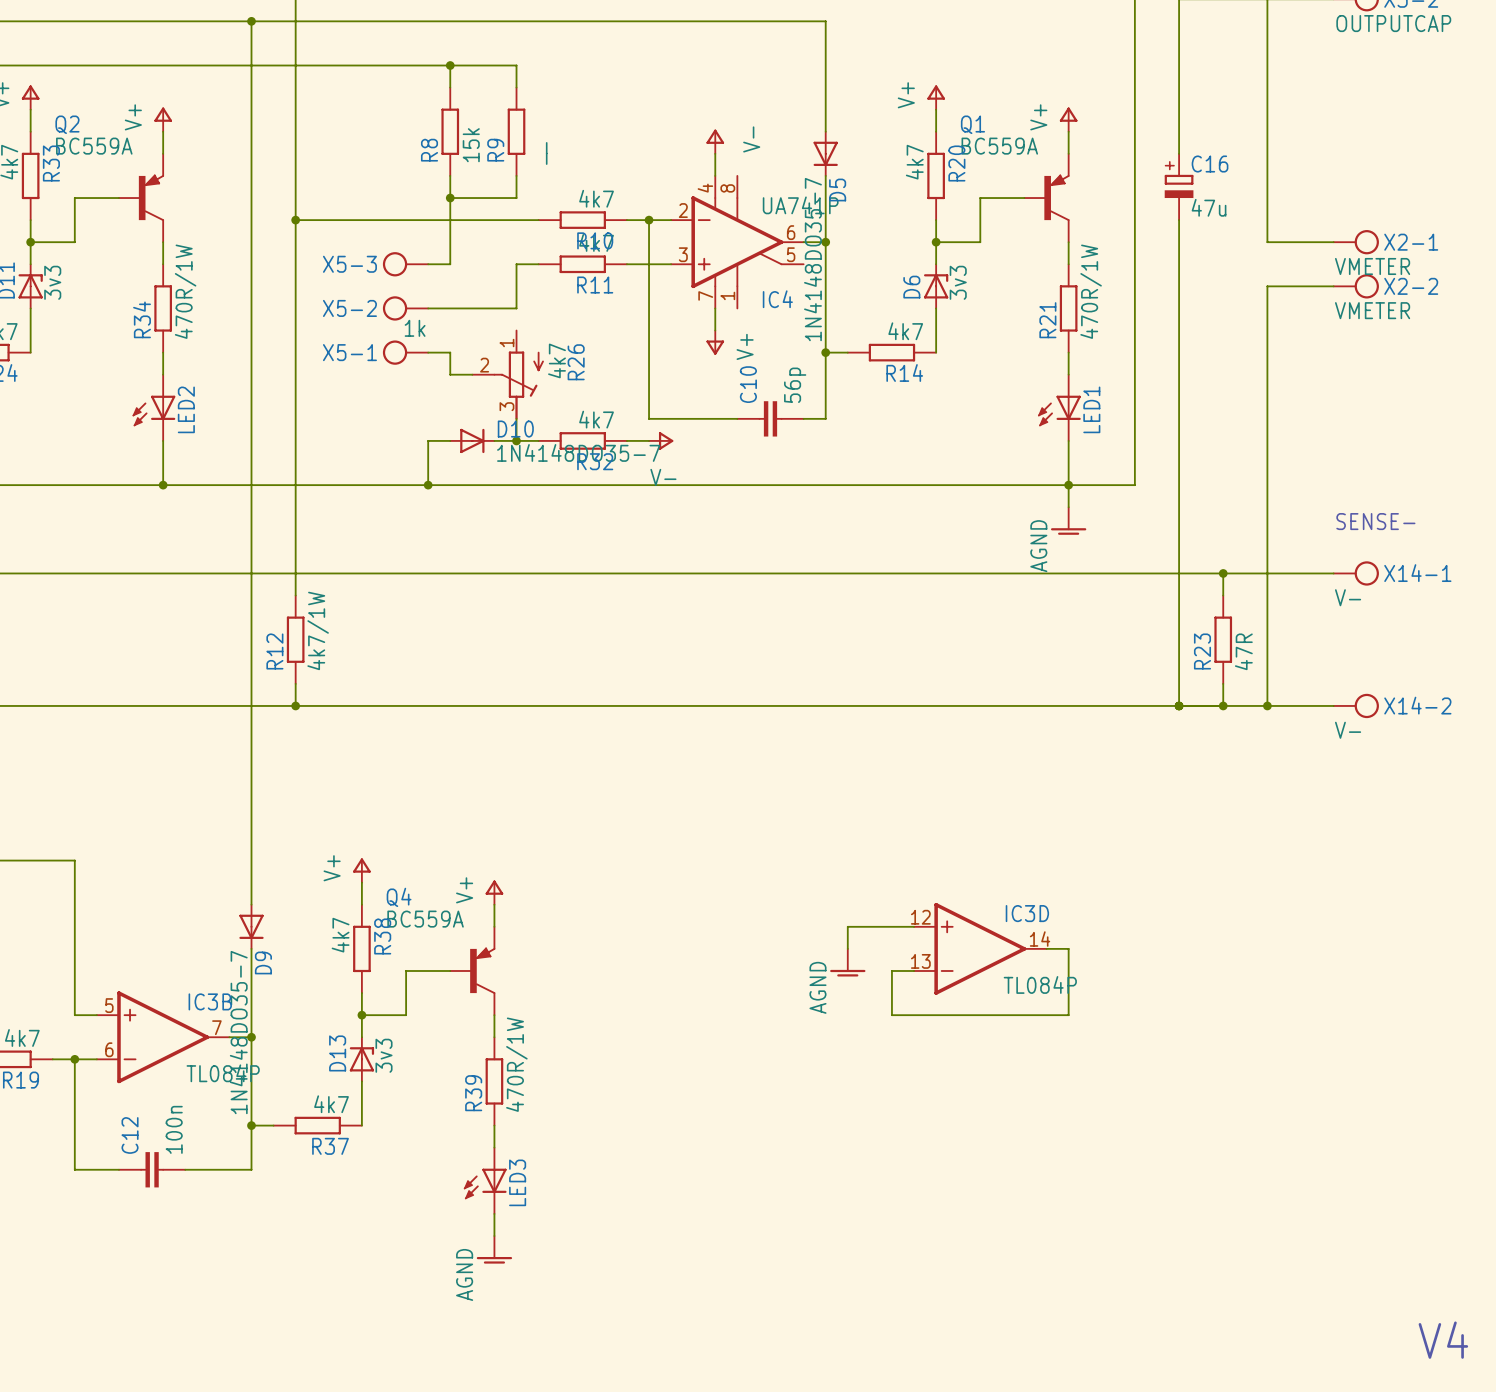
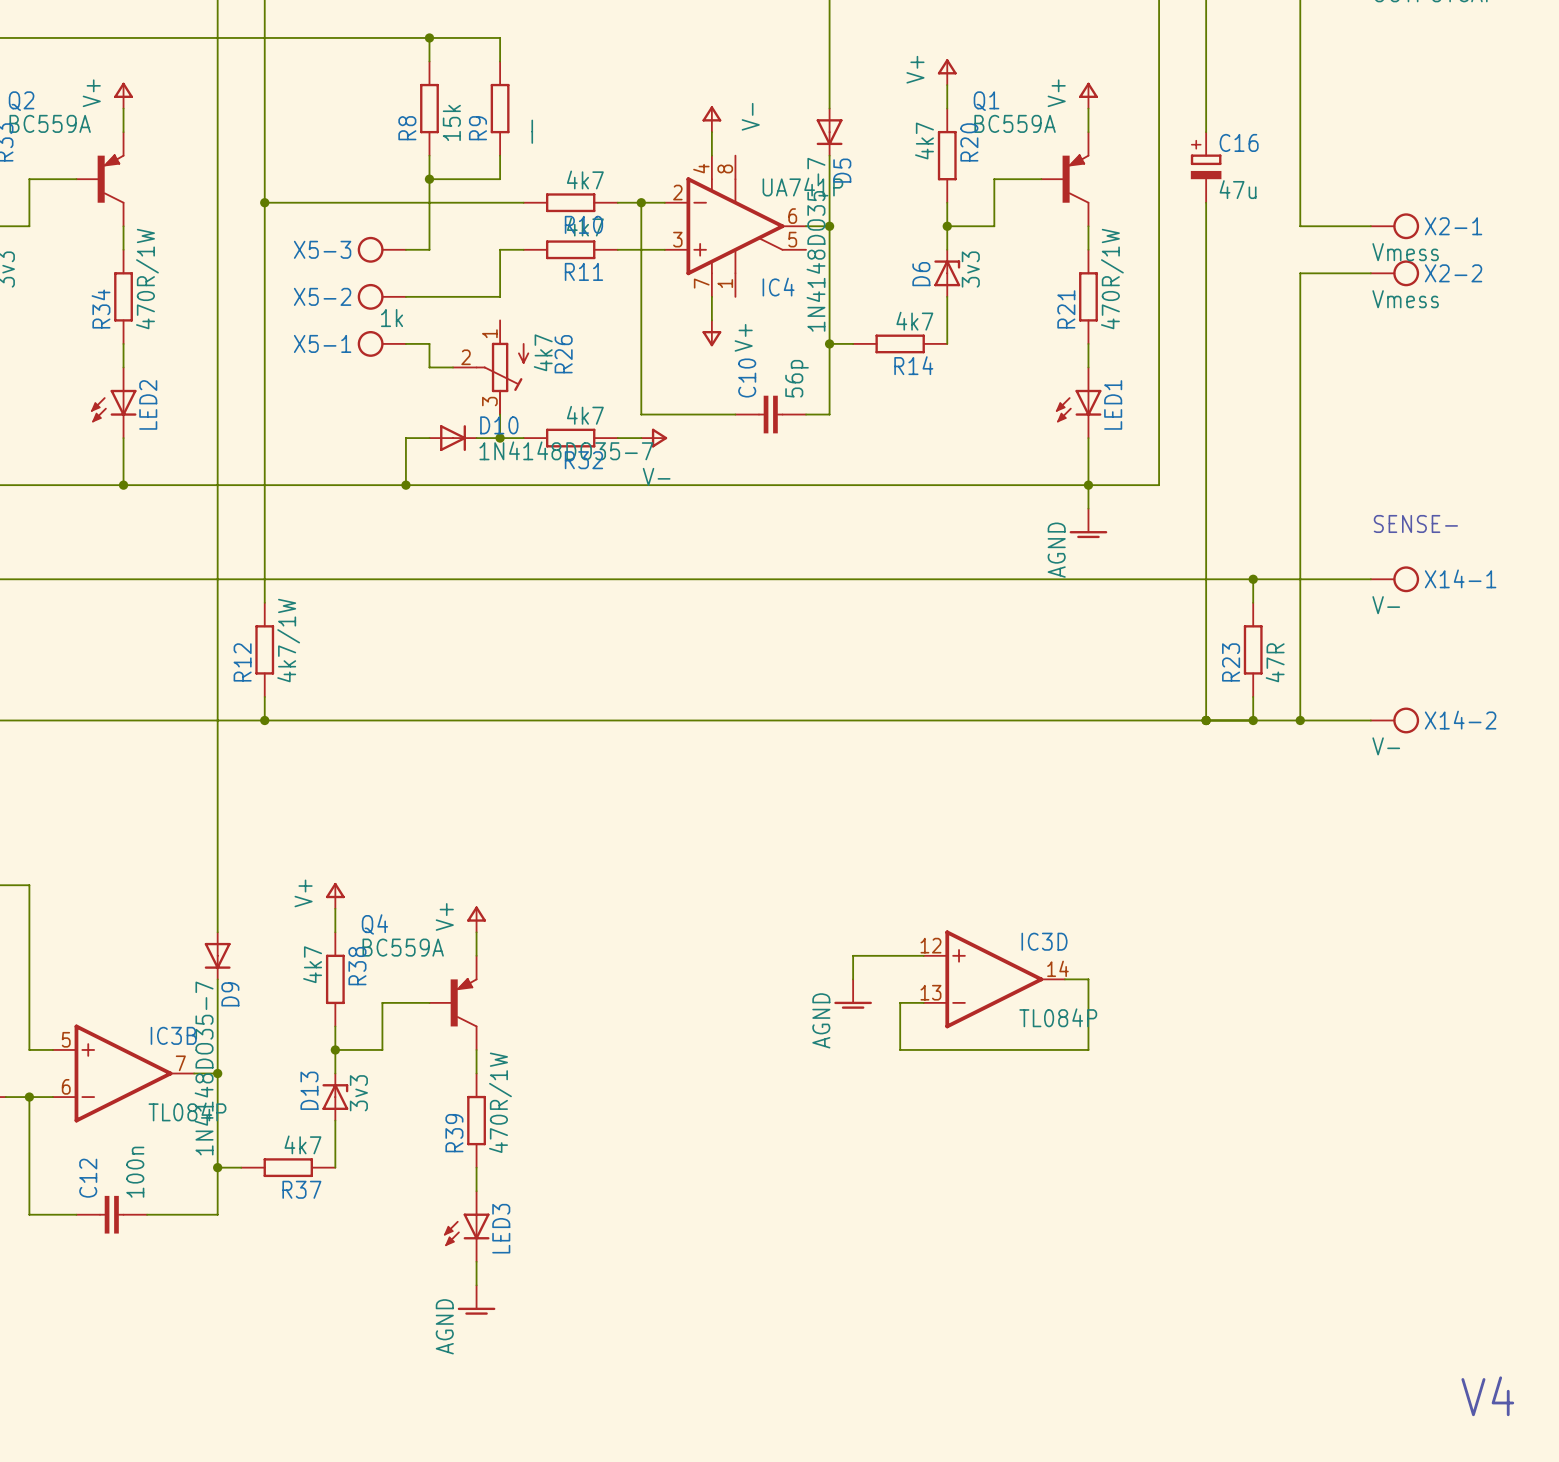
X2-1 value: VMETER (1372, 266) -> Vmess (1405, 252)
X2-2 value: VMETER (1372, 310) -> Vmess (1405, 299)

